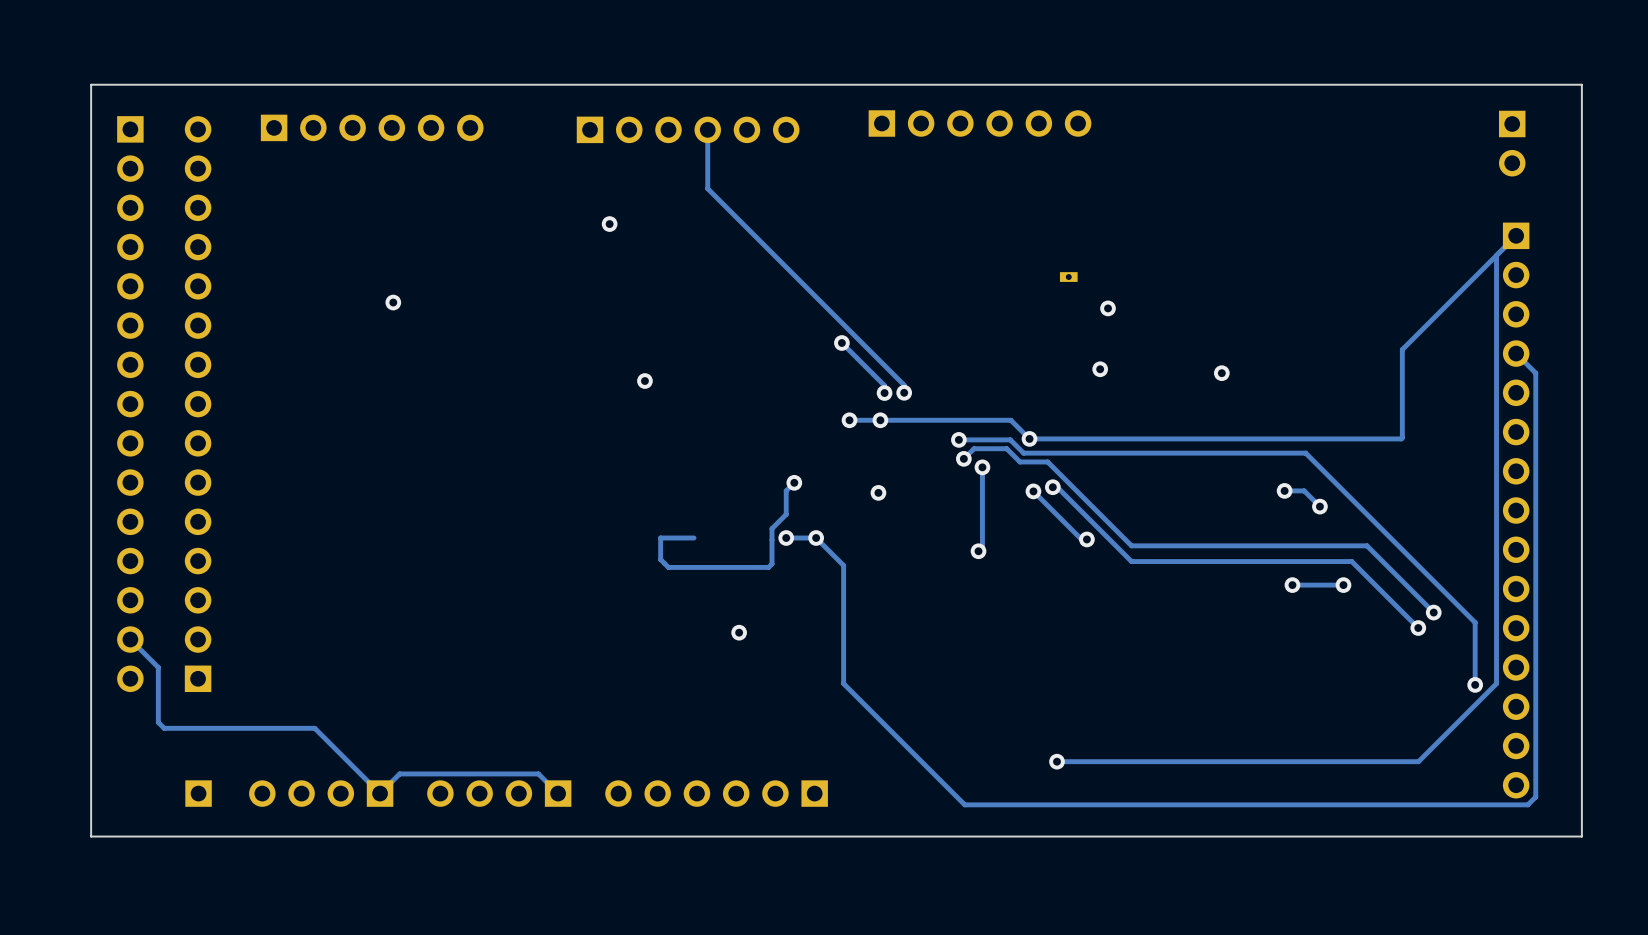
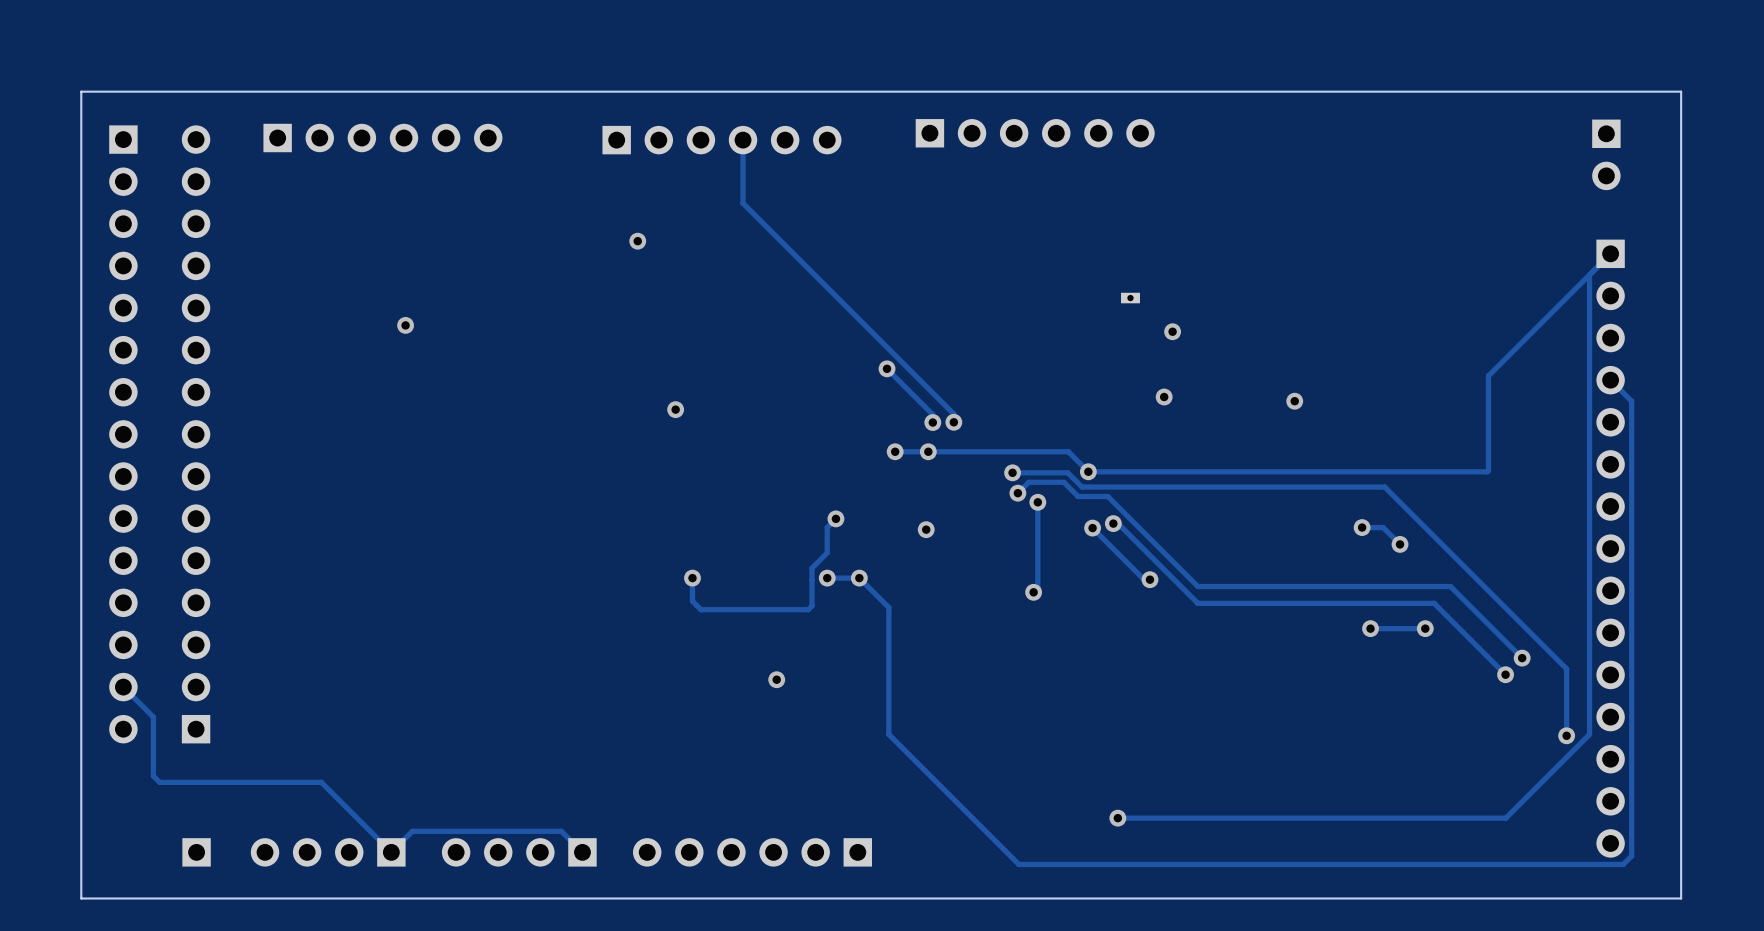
via: none -> (692, 578)
track: (694, 538) (660, 538) -> none

